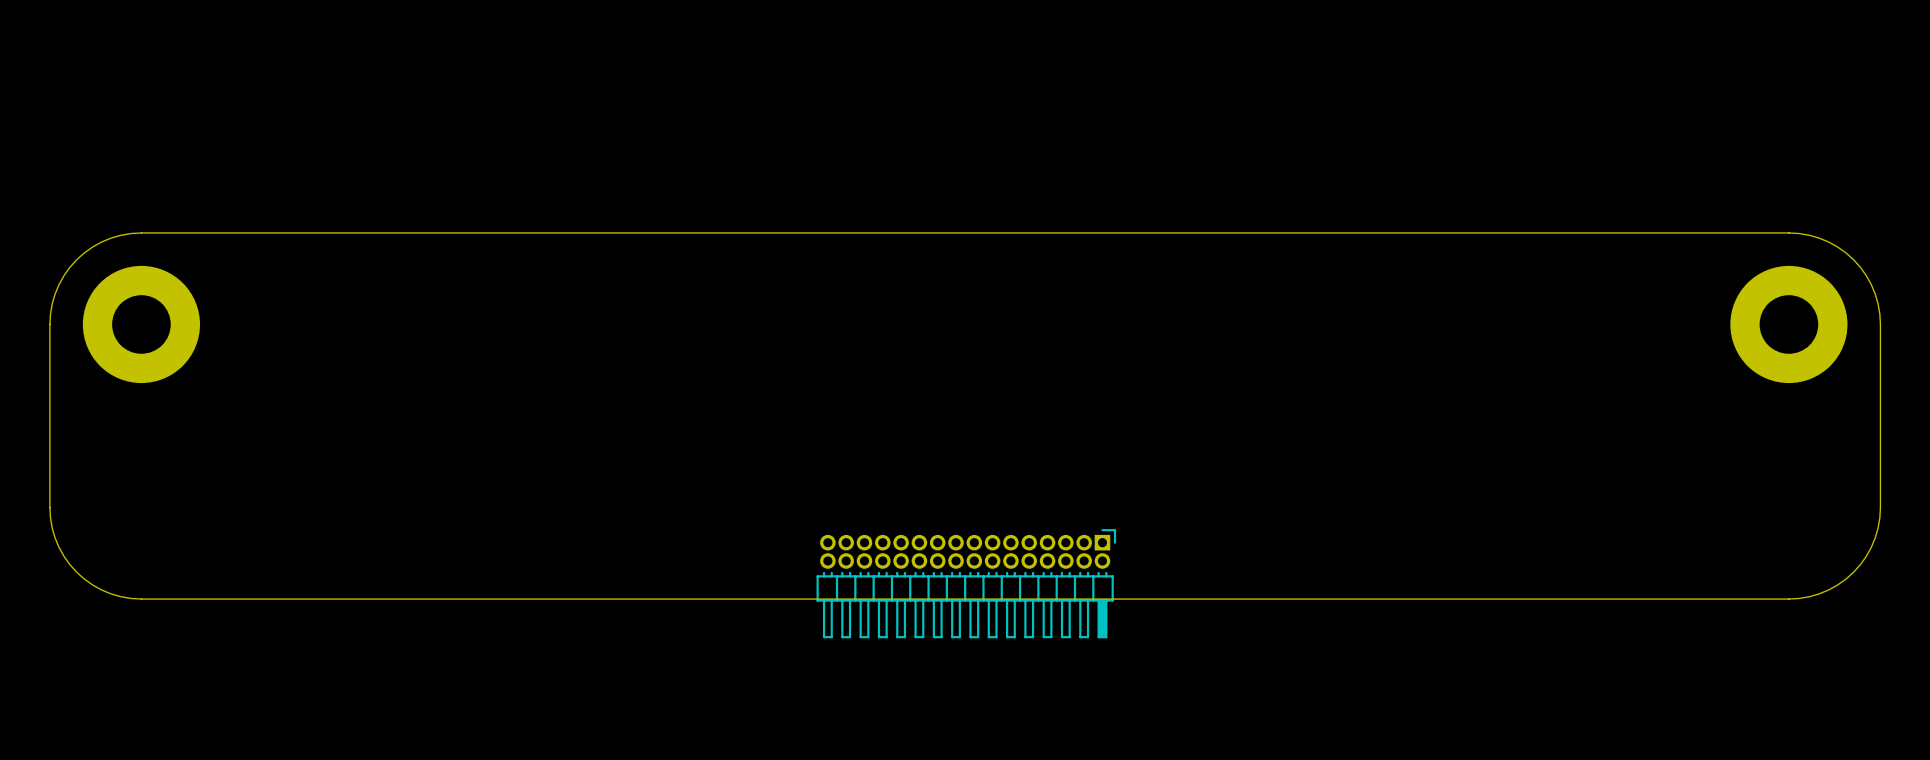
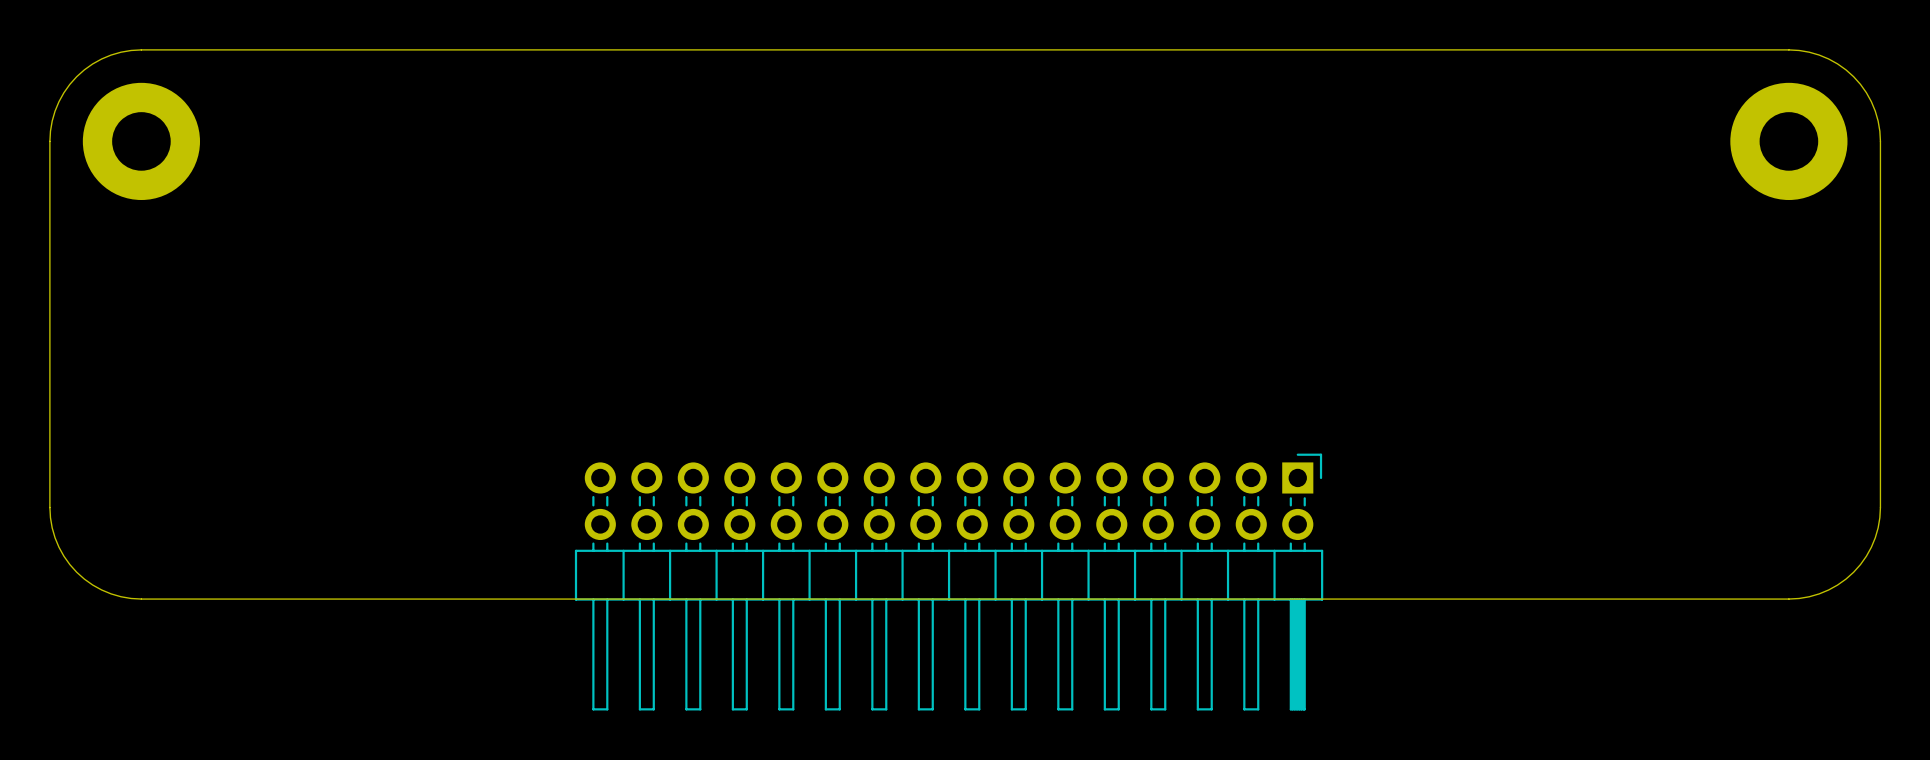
board edge: (49, 324) (55, 294) (63, 275) (76, 259) (92, 246) (111, 238) (141, 232) (1788, 232) (1819, 238) (1837, 246) (1853, 259) (1866, 275) (1875, 294) (1880, 324) -> (49, 324) (49, 141) (55, 111) (63, 92) (84, 69) (111, 55) (141, 49) (1799, 50) (1819, 55) (1845, 69) (1866, 92) (1875, 111) (1880, 141) (1880, 324)
part position: (141, 324) -> (141, 141)
part position: (1788, 324) -> (1788, 141)
part footprint: [816, 529, 1117, 639] -> [574, 453, 1324, 711]

